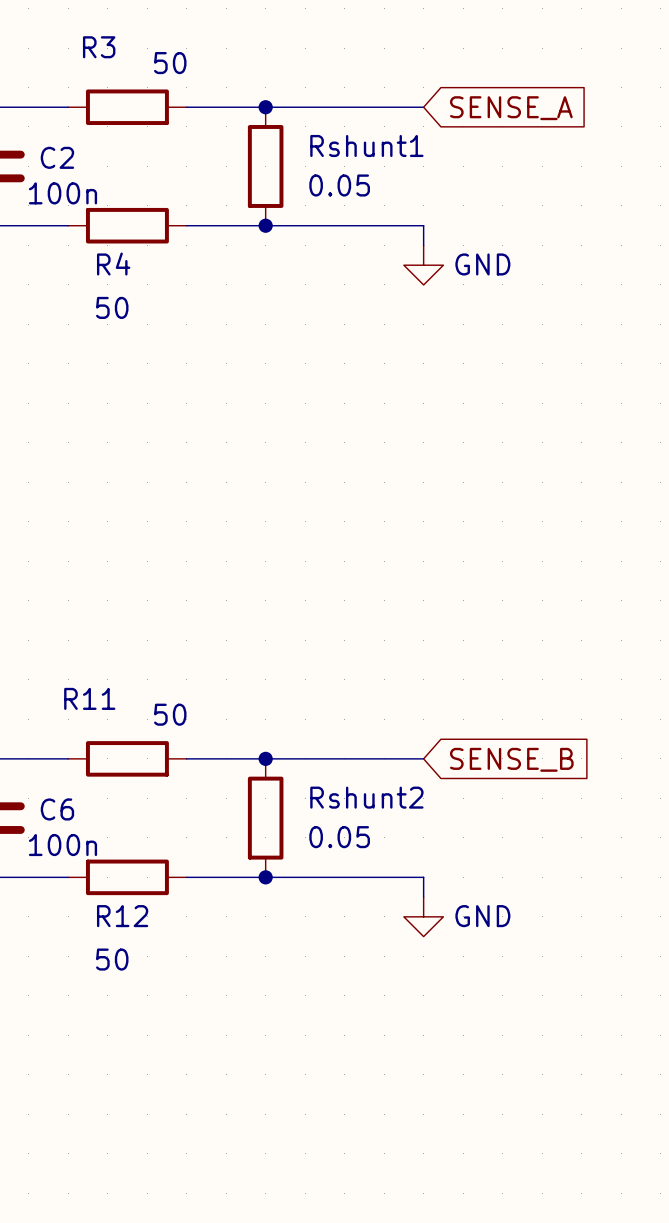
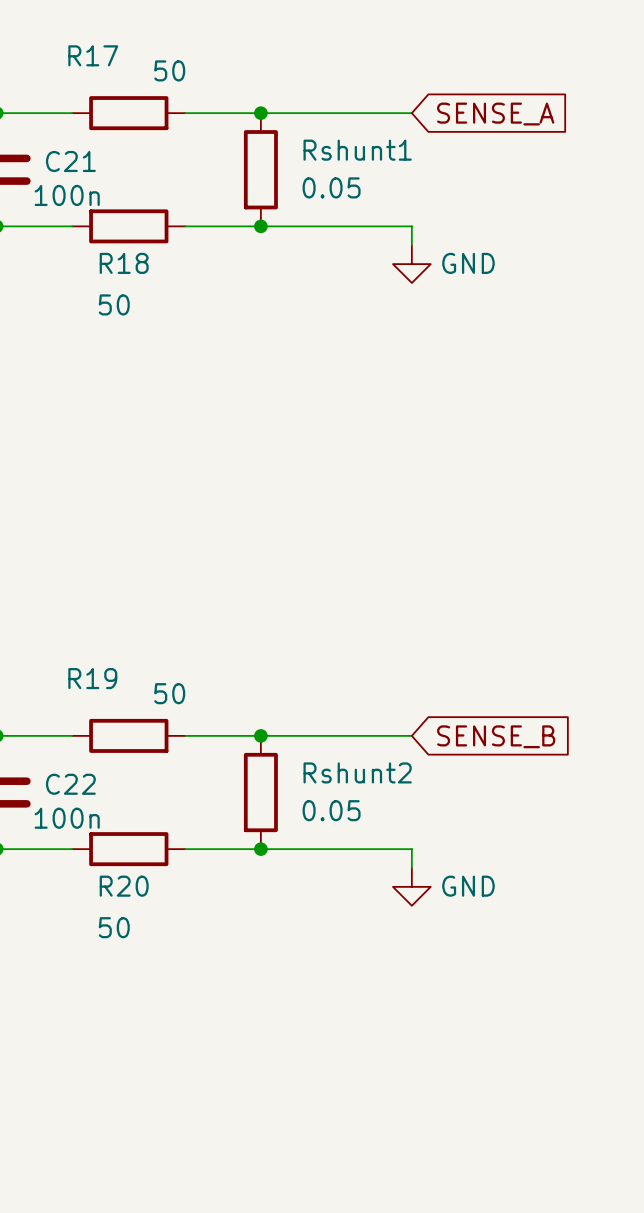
R3 name: R3 (99, 47) -> R17 (93, 55)
C2 name: C2 (57, 157) -> C21 (70, 161)
R4 name: R4 (113, 264) -> R18 (124, 263)
R11 name: R11 (89, 698) -> R19 (92, 678)
C6 name: C6 (57, 809) -> C22 (70, 784)
R12 name: R12 (122, 916) -> R20 (124, 886)

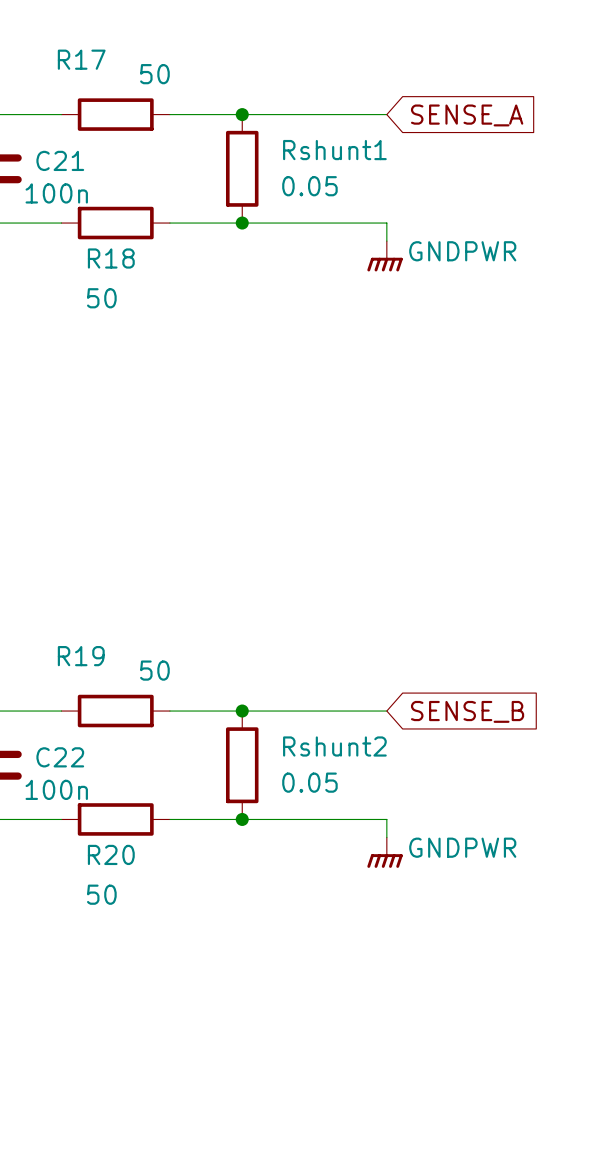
power symbol: GND (411, 264) -> GNDPWR (385, 256)
power symbol: GND (411, 886) -> GNDPWR (385, 852)

